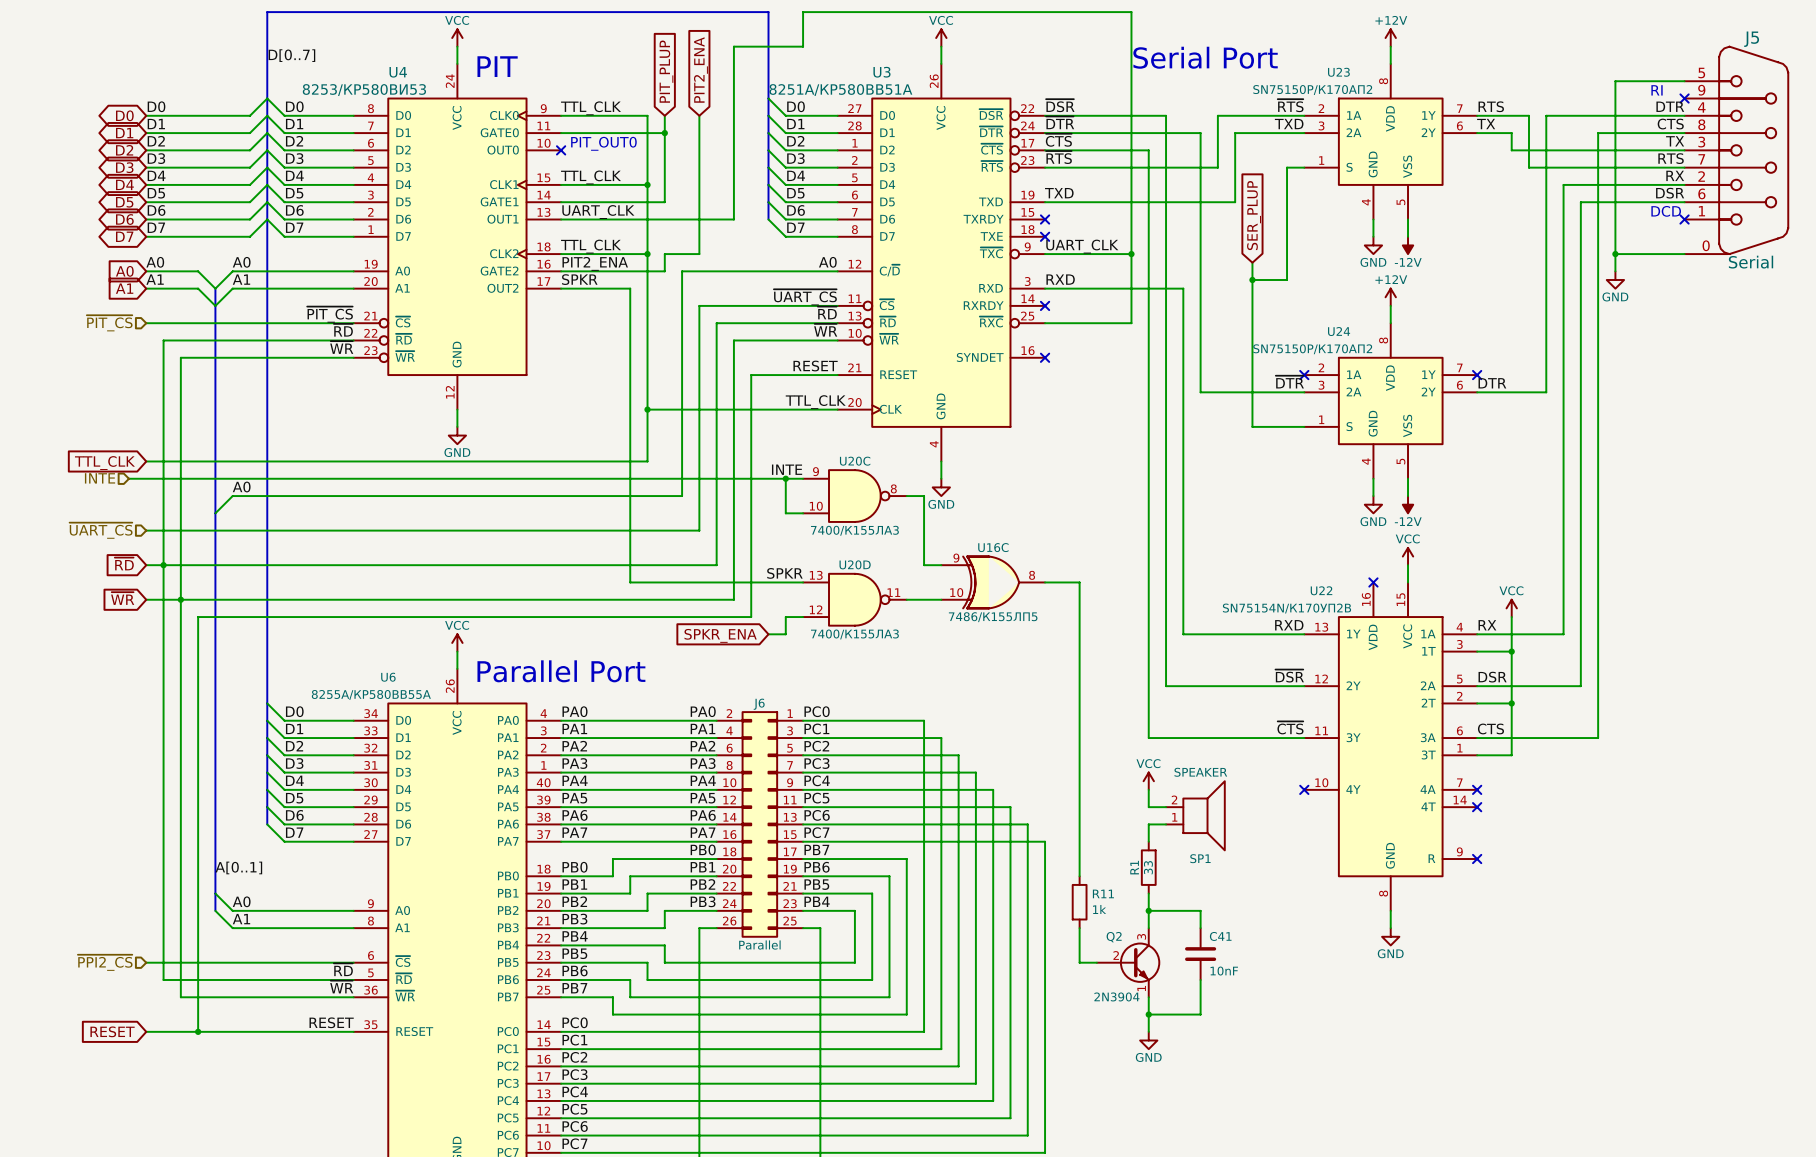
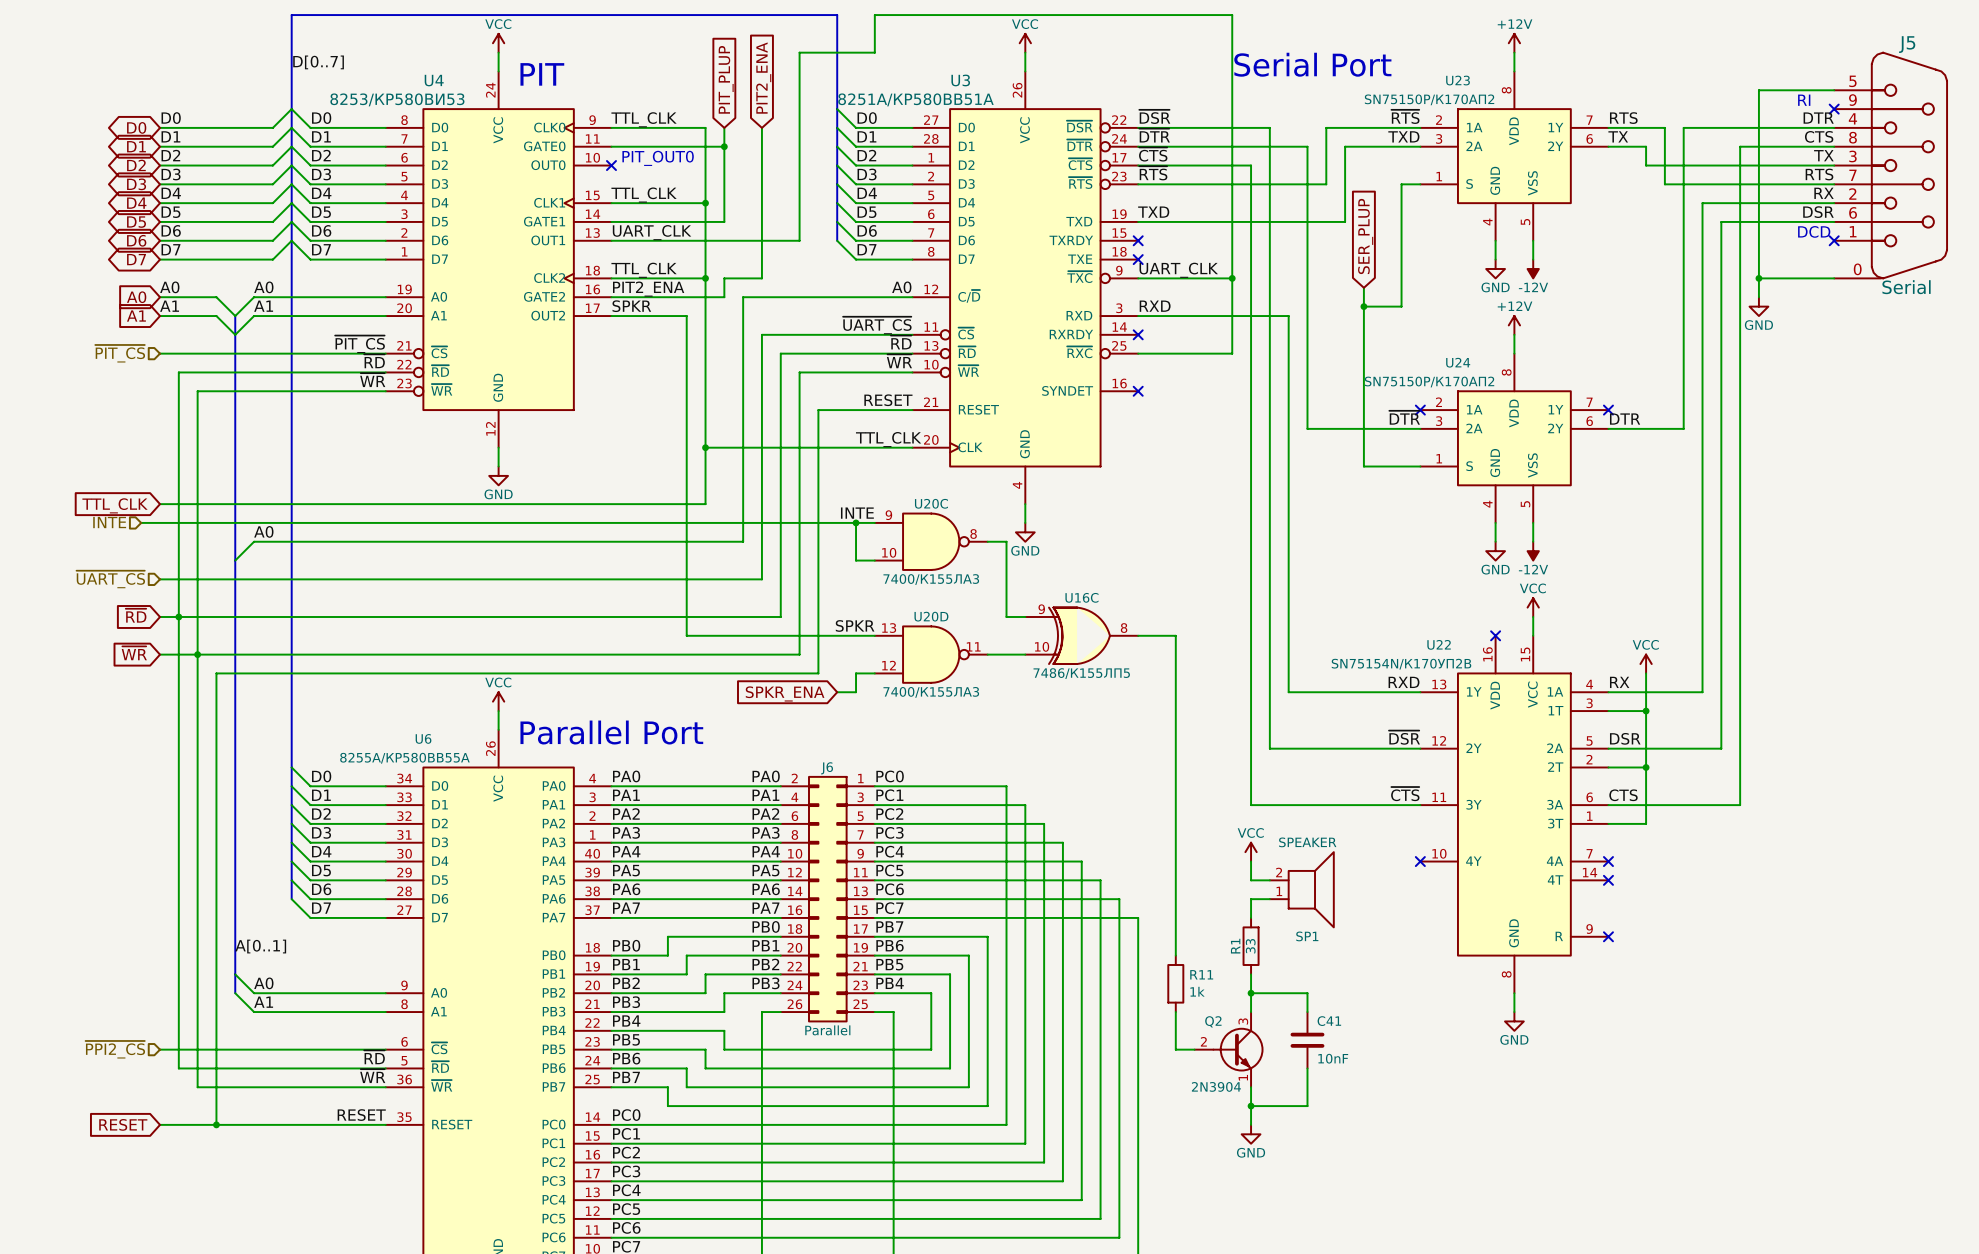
Q2 symbol: [1096, 928, 1161, 998] -> [1194, 1012, 1264, 1088]

